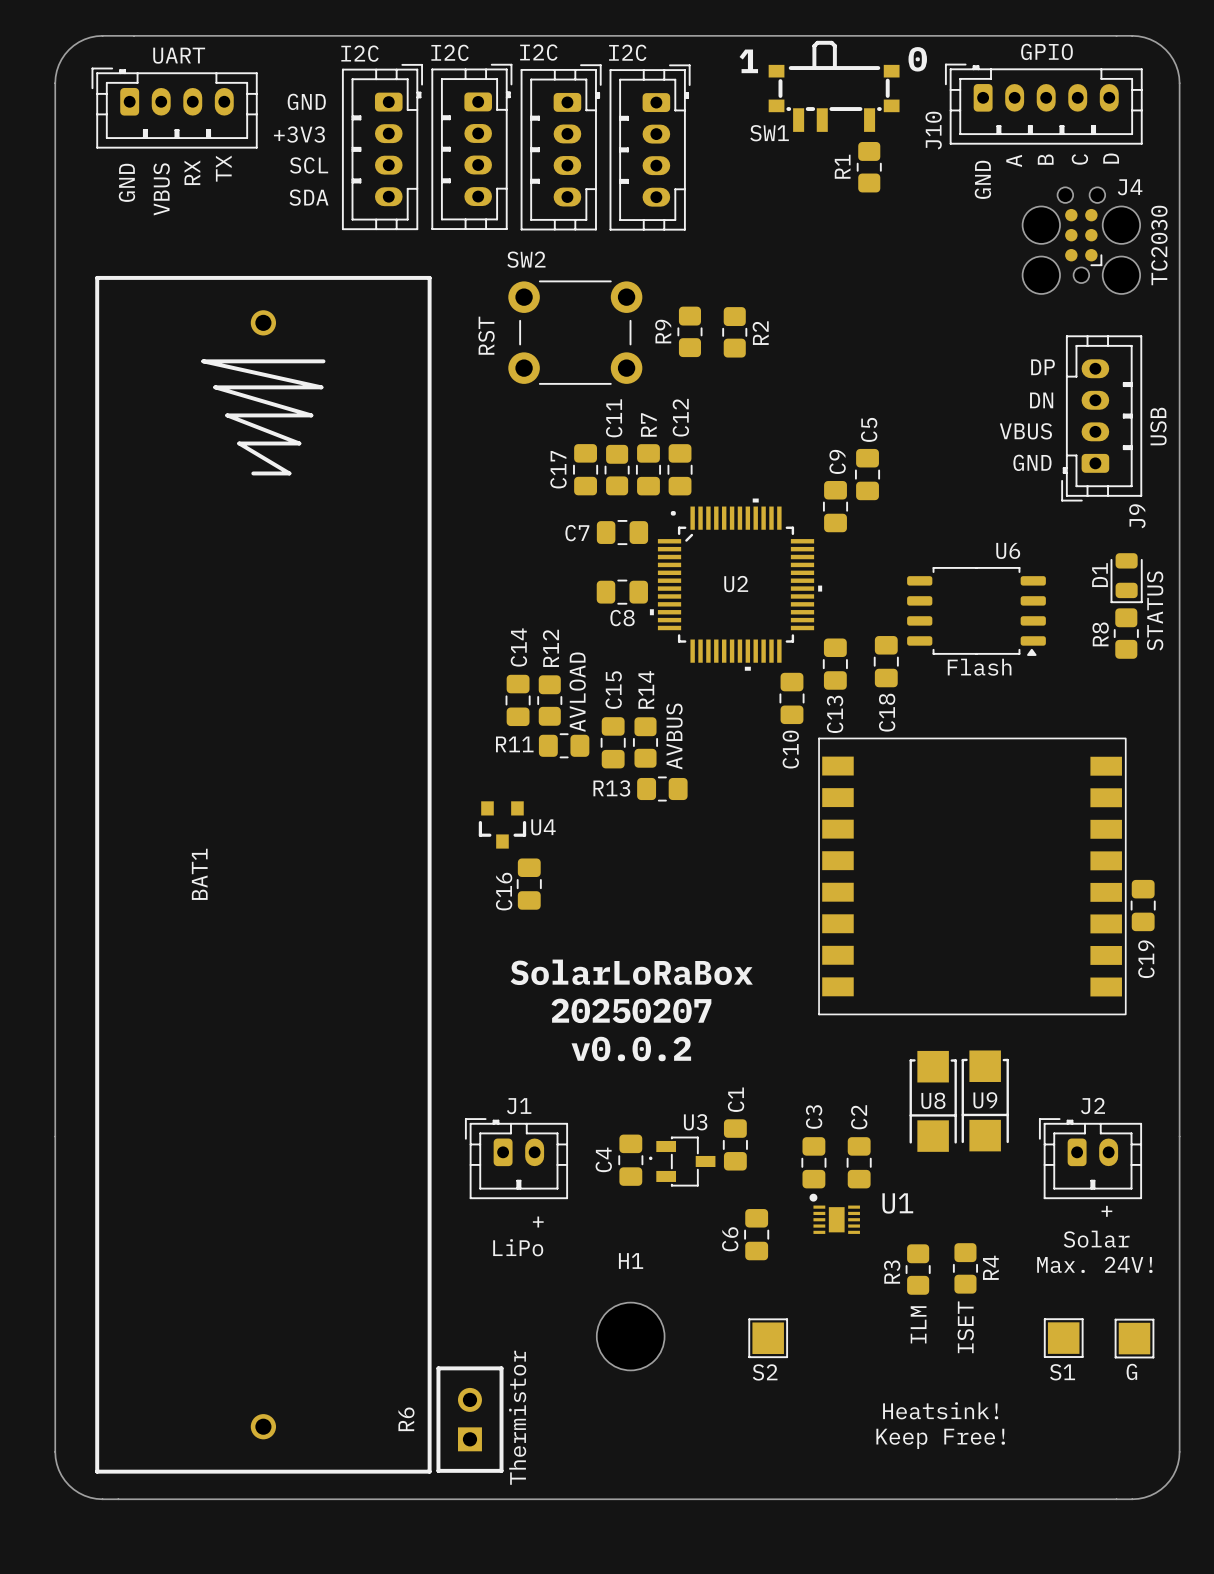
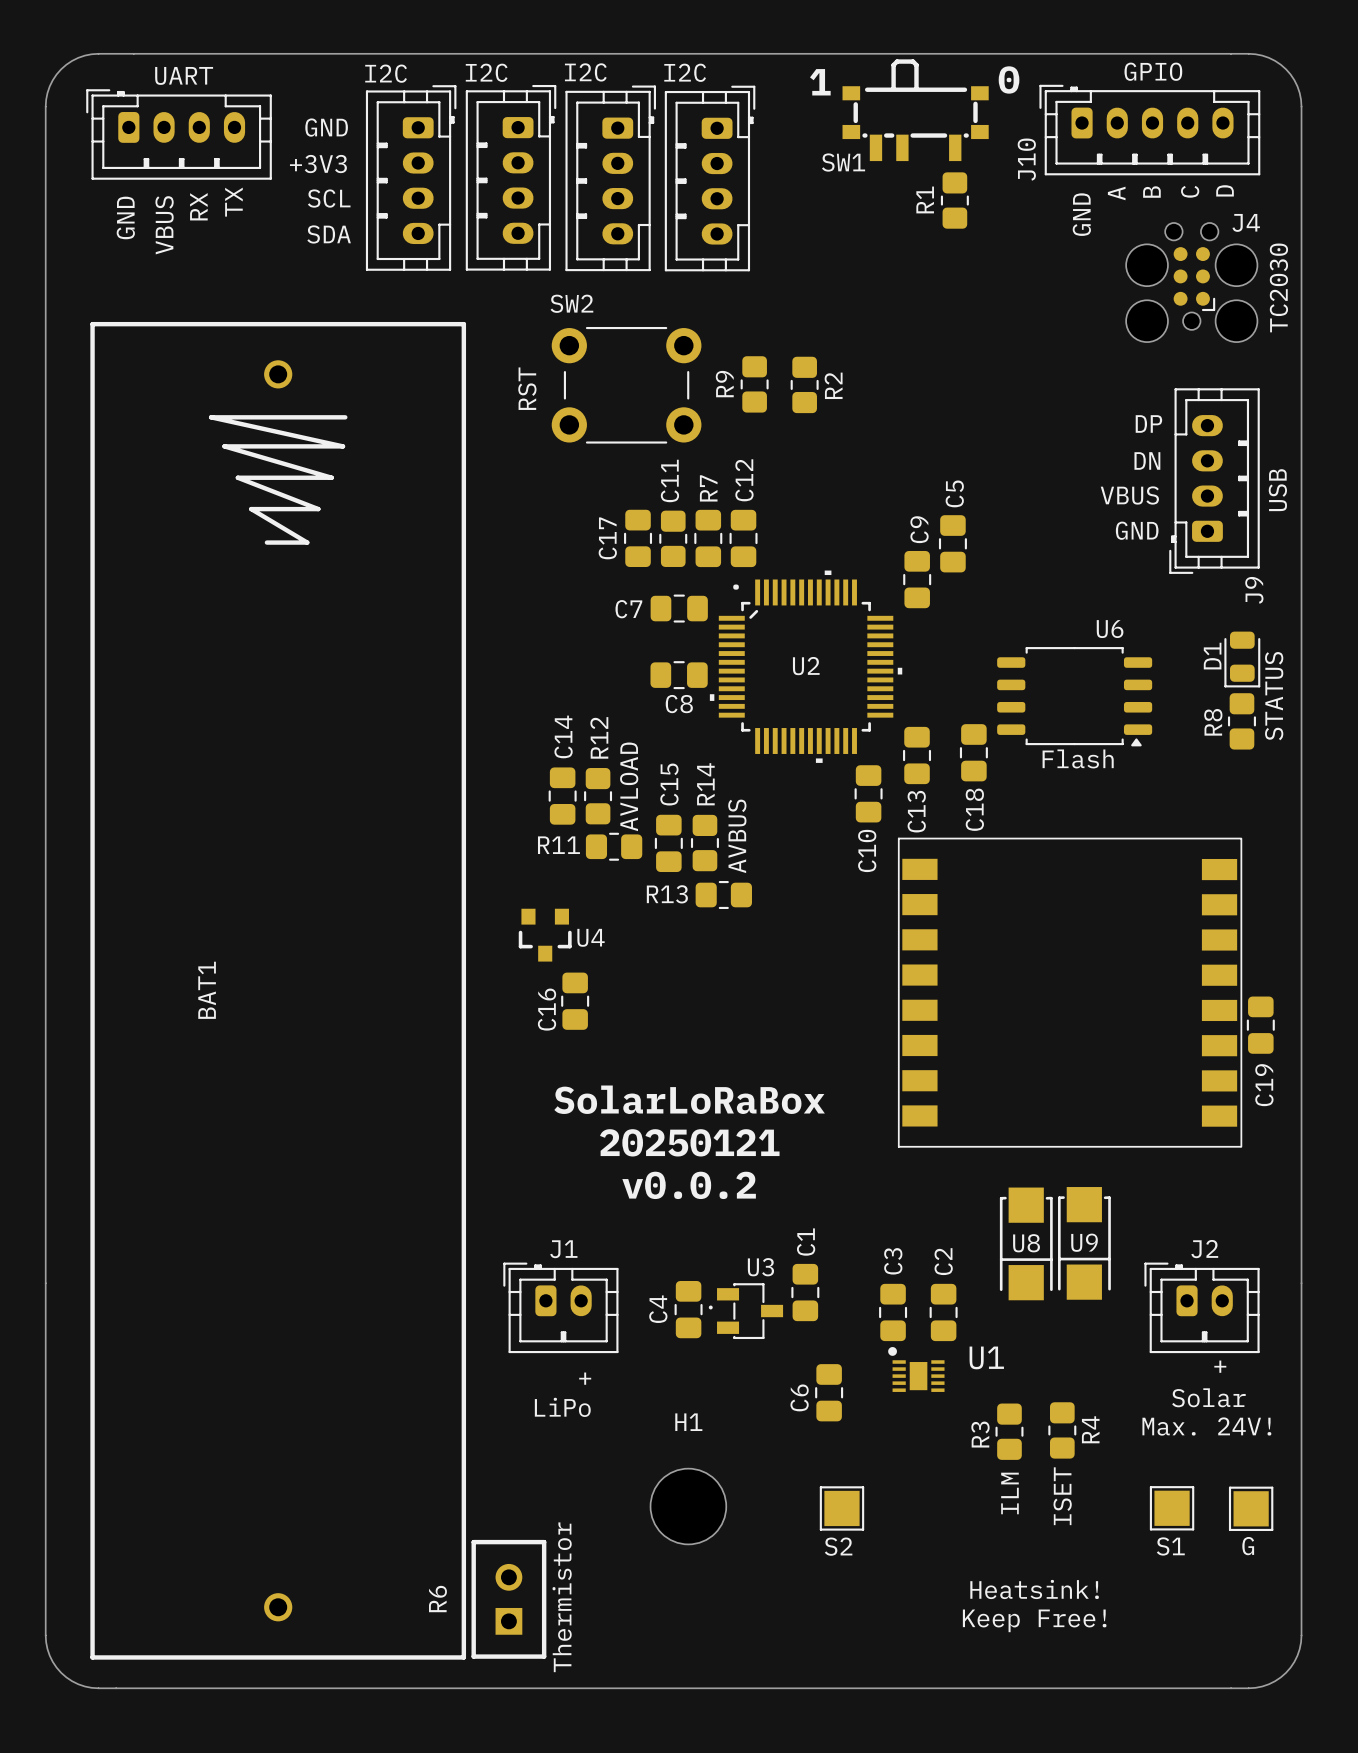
text: 20250207 (631, 1010) -> 20250121 (689, 1142)

